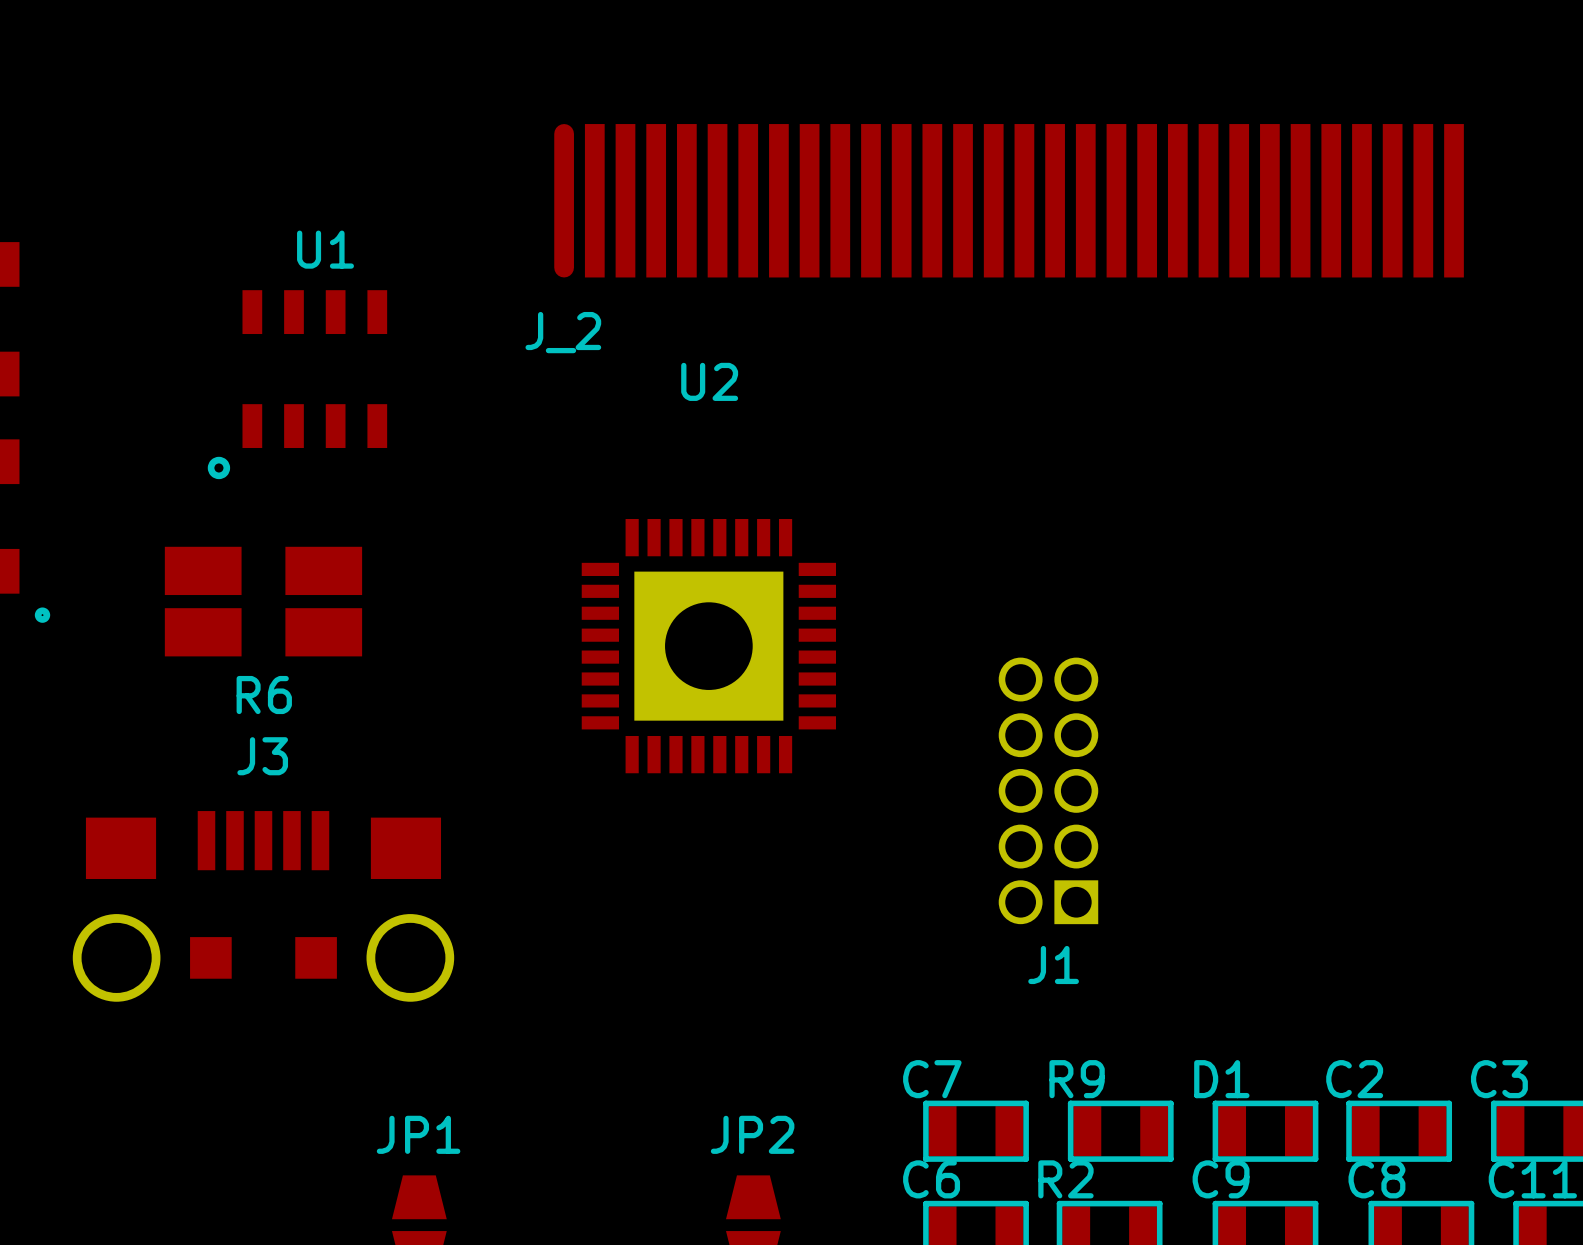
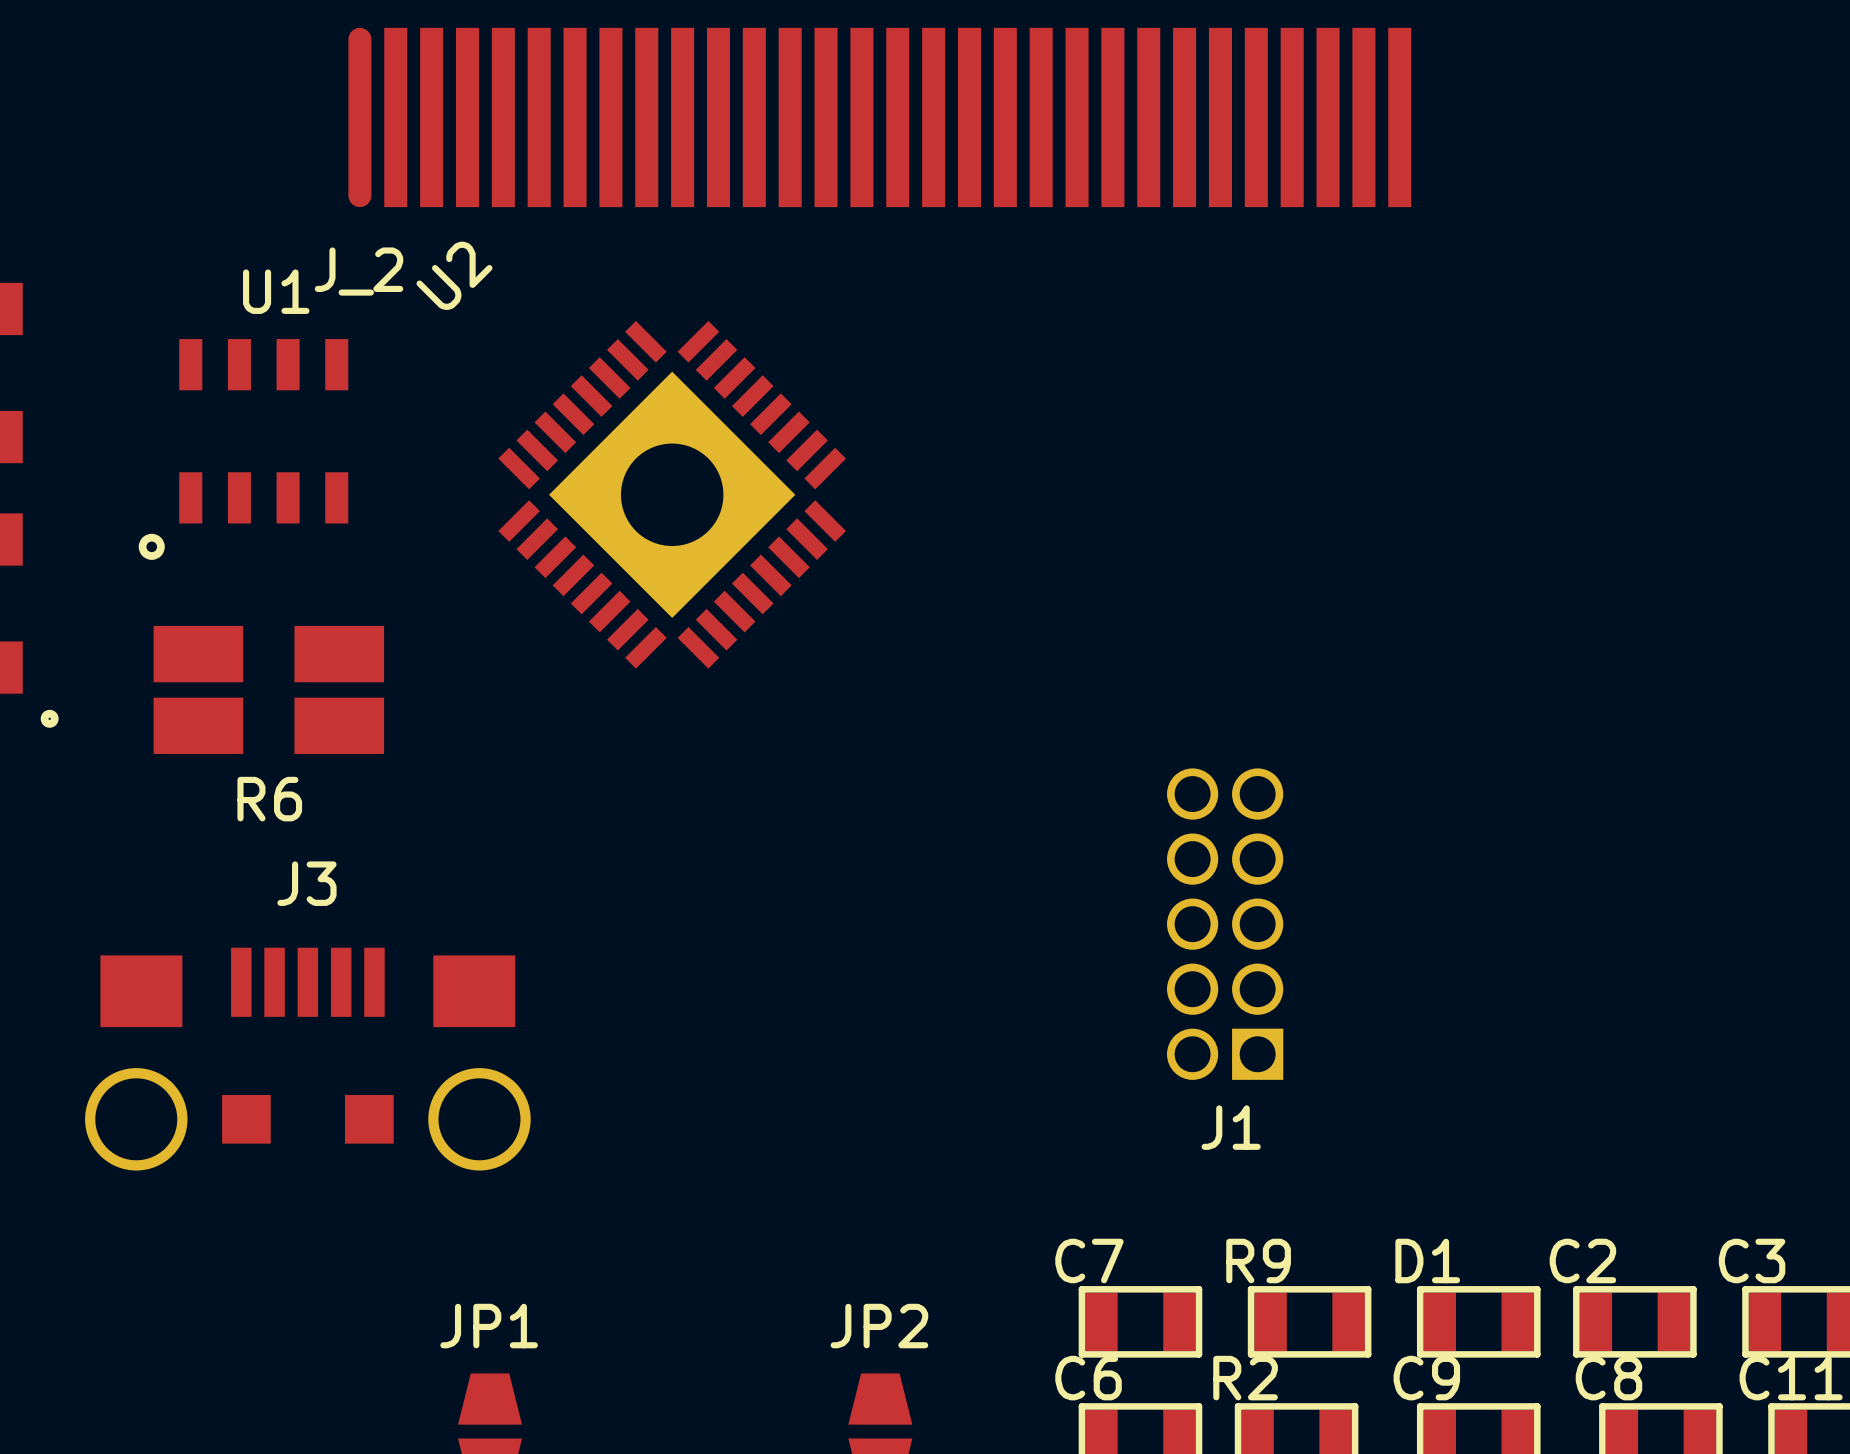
J_2 position: (1009, 200) -> (879, 117)
U2 name position: U2 (709, 381) -> U2 (454, 275)
U1 position: (297, 384) -> (243, 449)
R6 position: (263, 601) -> (268, 689)
U2 rotation: 0° (708, 646) -> 45° clockwise (672, 494)
U2 position: (708, 646) -> (672, 494)

